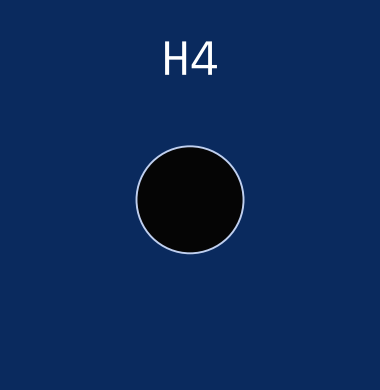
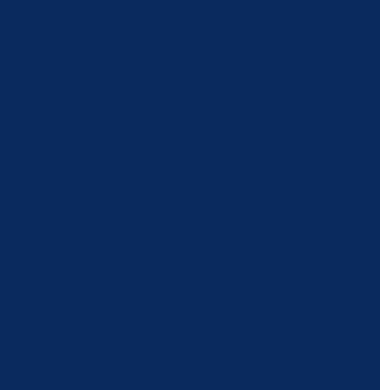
H4: (190, 199) -> none

